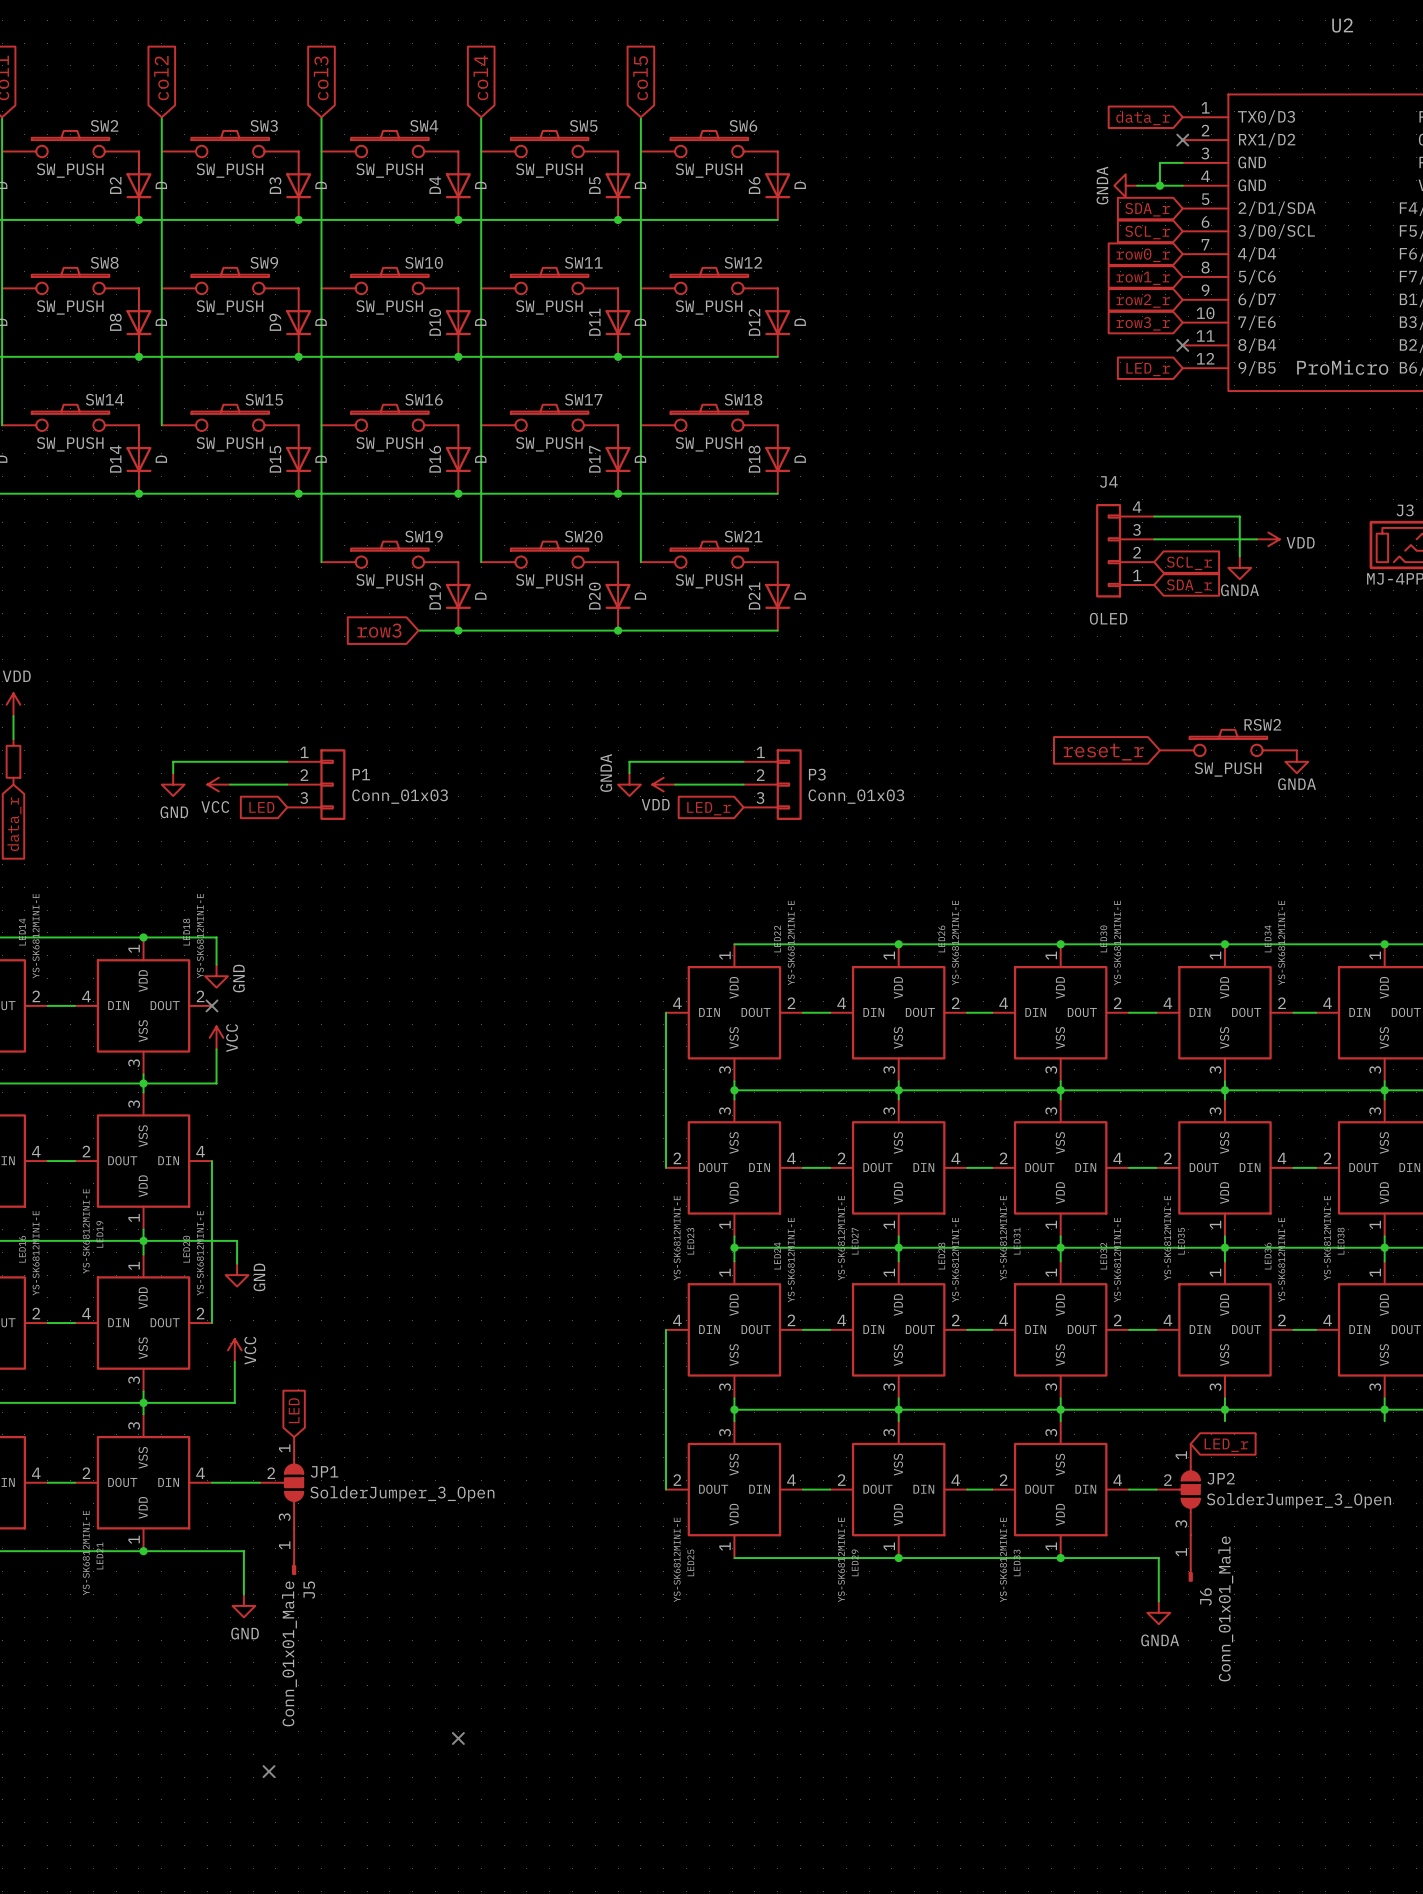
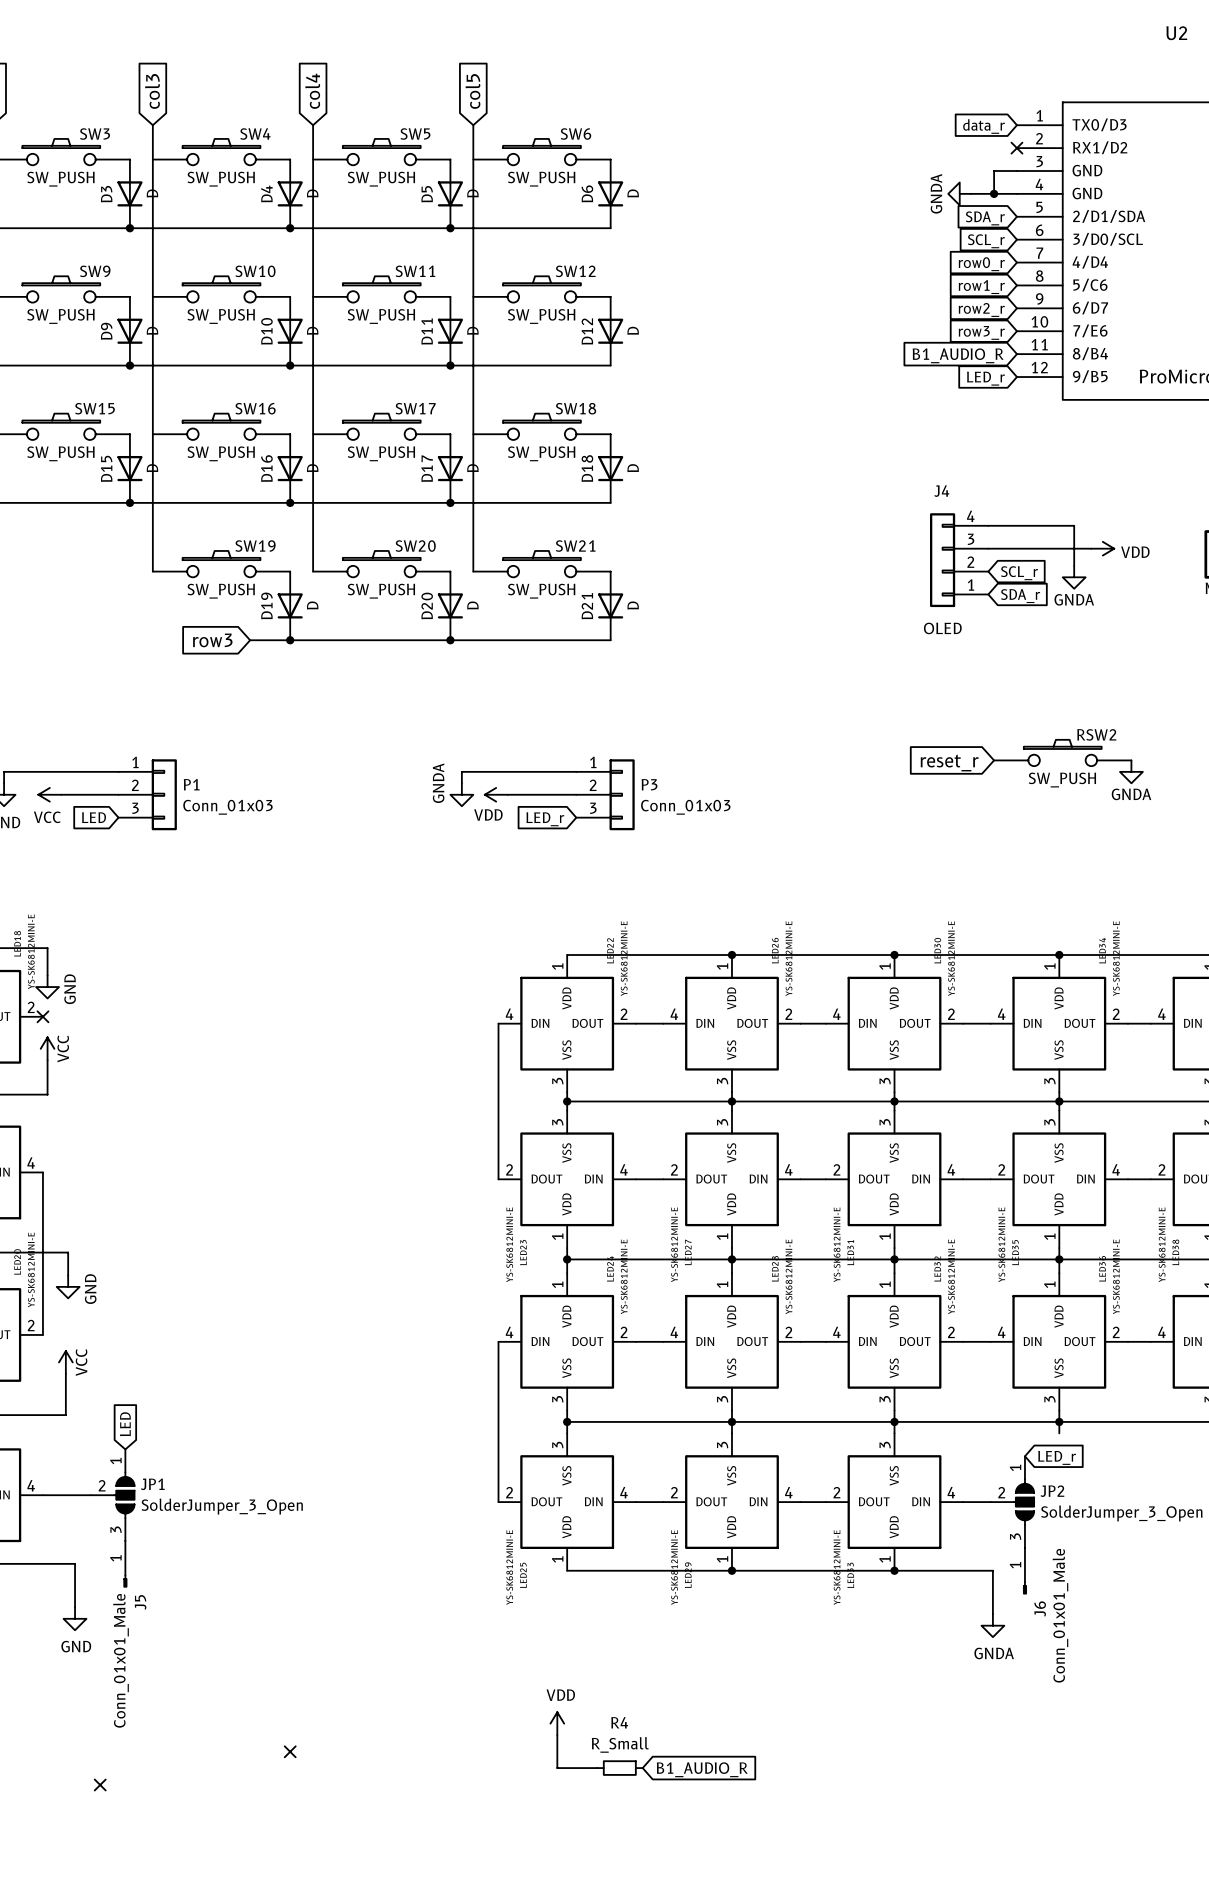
no-connect mark: (1182, 345) -> none
global label: none -> B1_AUDIO_R (958, 355)
power symbol: none -> VDD (557, 1723)
wire: none -> (557, 1735) (557, 1768) (596, 1768)
R4: none -> R_Small (619, 1768)
global label: none -> B1_AUDIO_R (702, 1769)

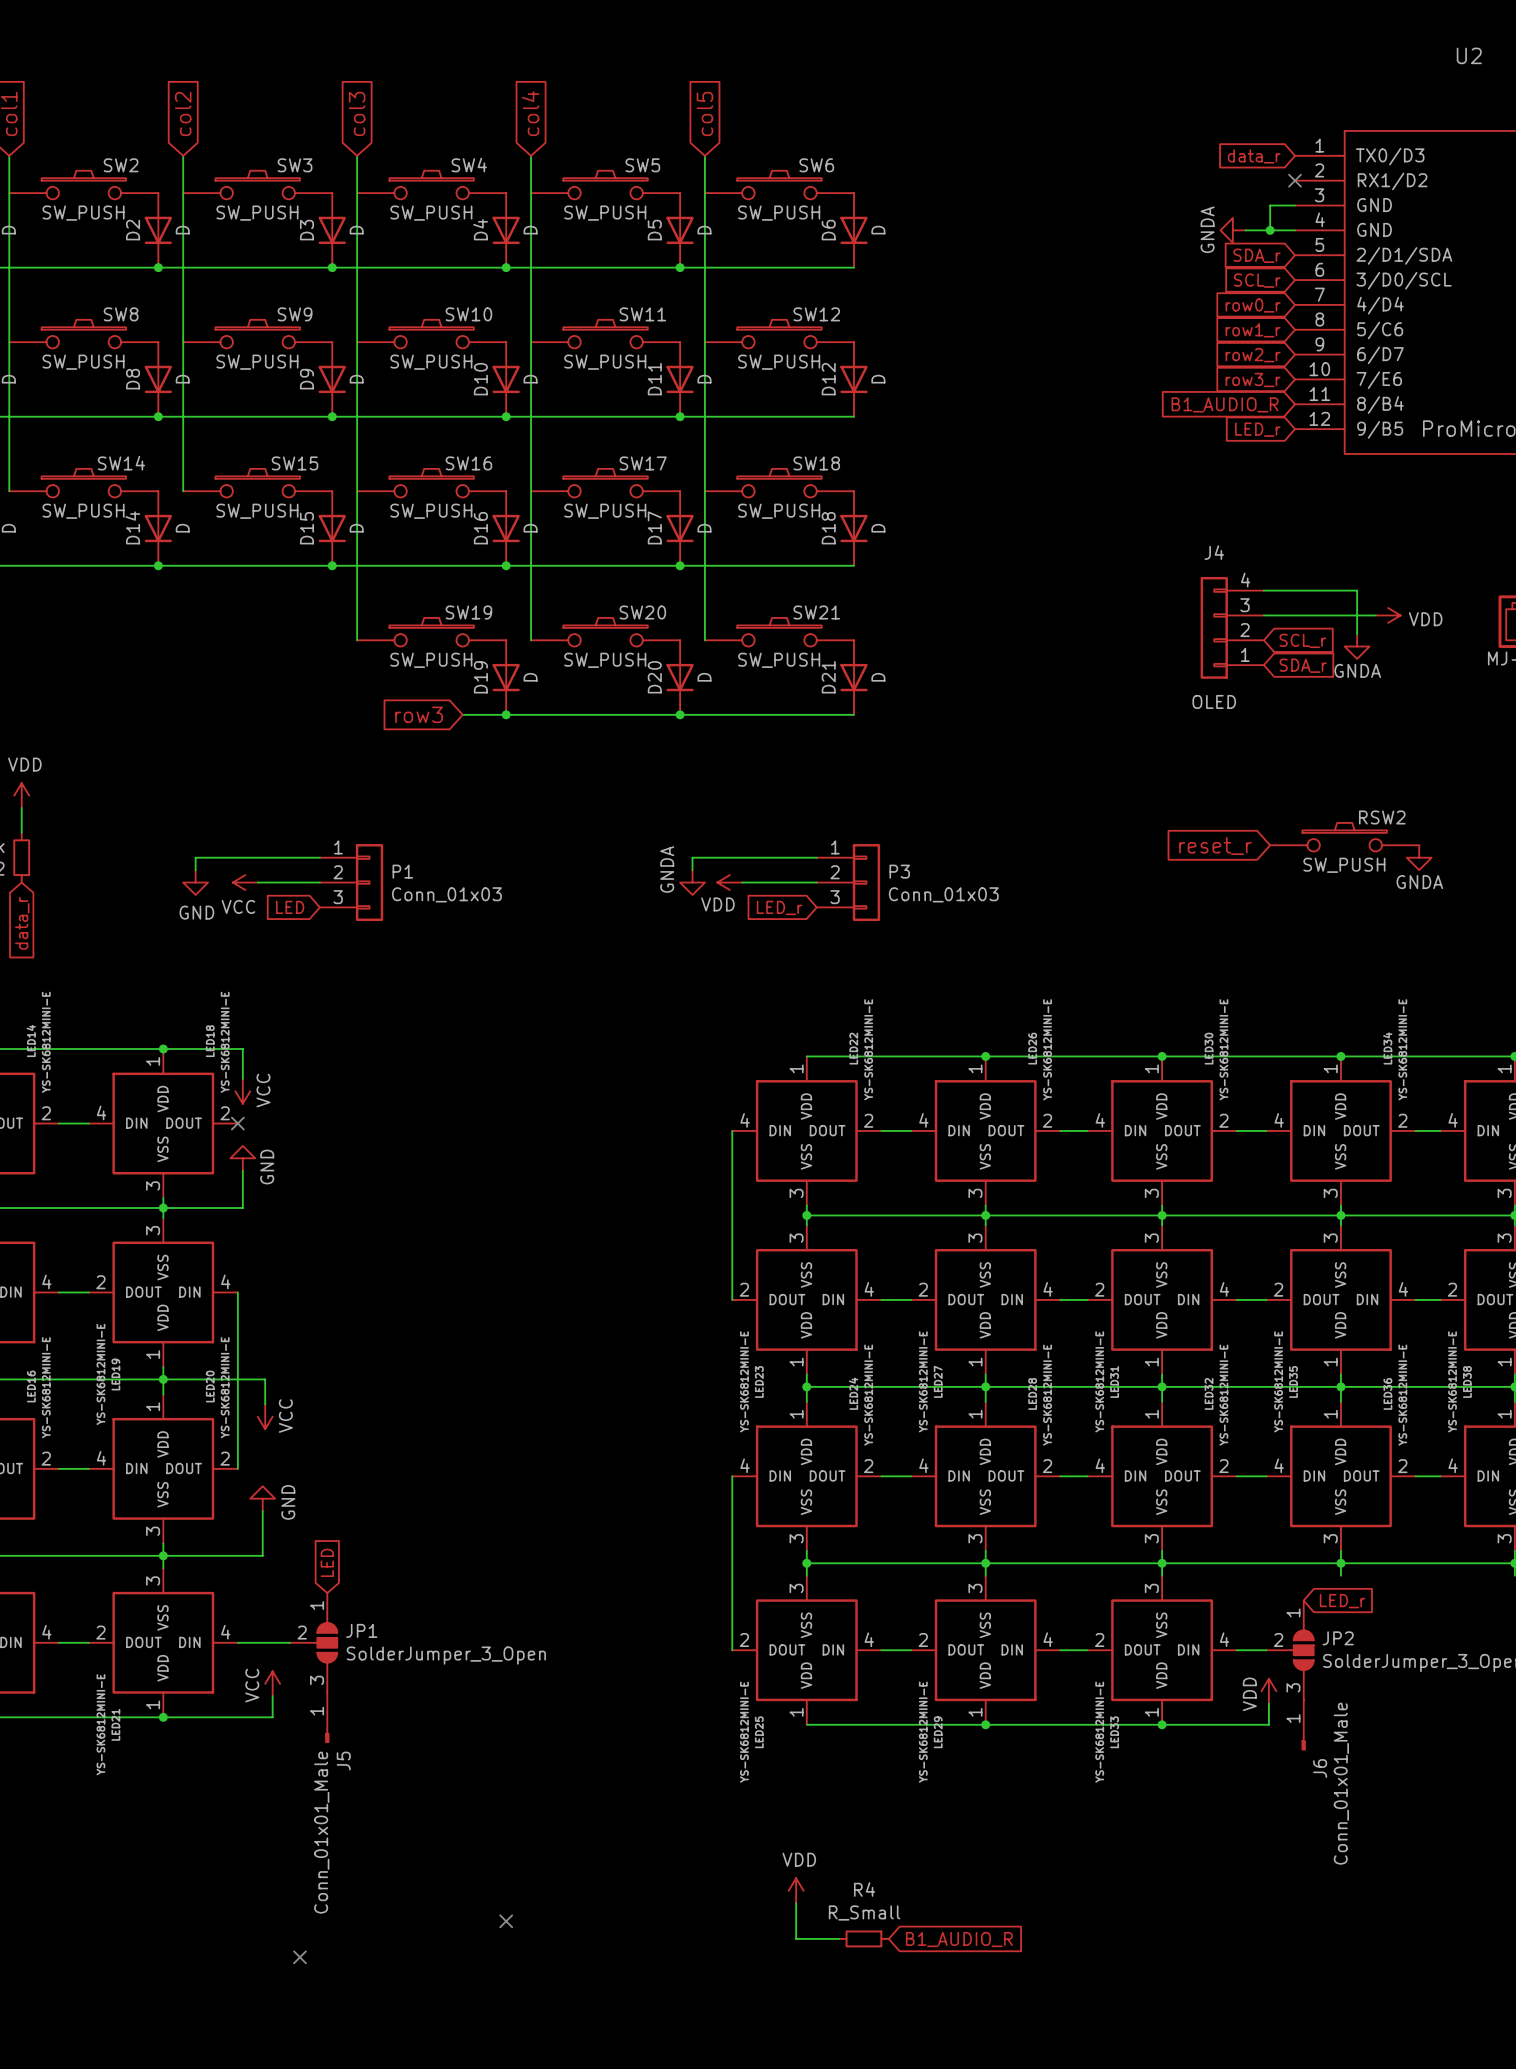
power symbol: GND (47, 987) -> VCC (242, 1091)
power symbol: VCC (47, 1048) -> GND (242, 1158)
power symbol: GND (68, 1286) -> VCC (265, 1416)
power symbol: VCC (65, 1362) -> GND (262, 1498)
power symbol: none -> VCC (272, 1683)
power symbol: none -> VDD (1268, 1691)
wire: (75, 1563) (75, 1607) -> (272, 1717) (272, 1696)
wire: (992, 1570) (992, 1614) -> (1268, 1724) (1268, 1703)
power symbol: GND (75, 1618) -> none
power symbol: GNDA (992, 1625) -> none

